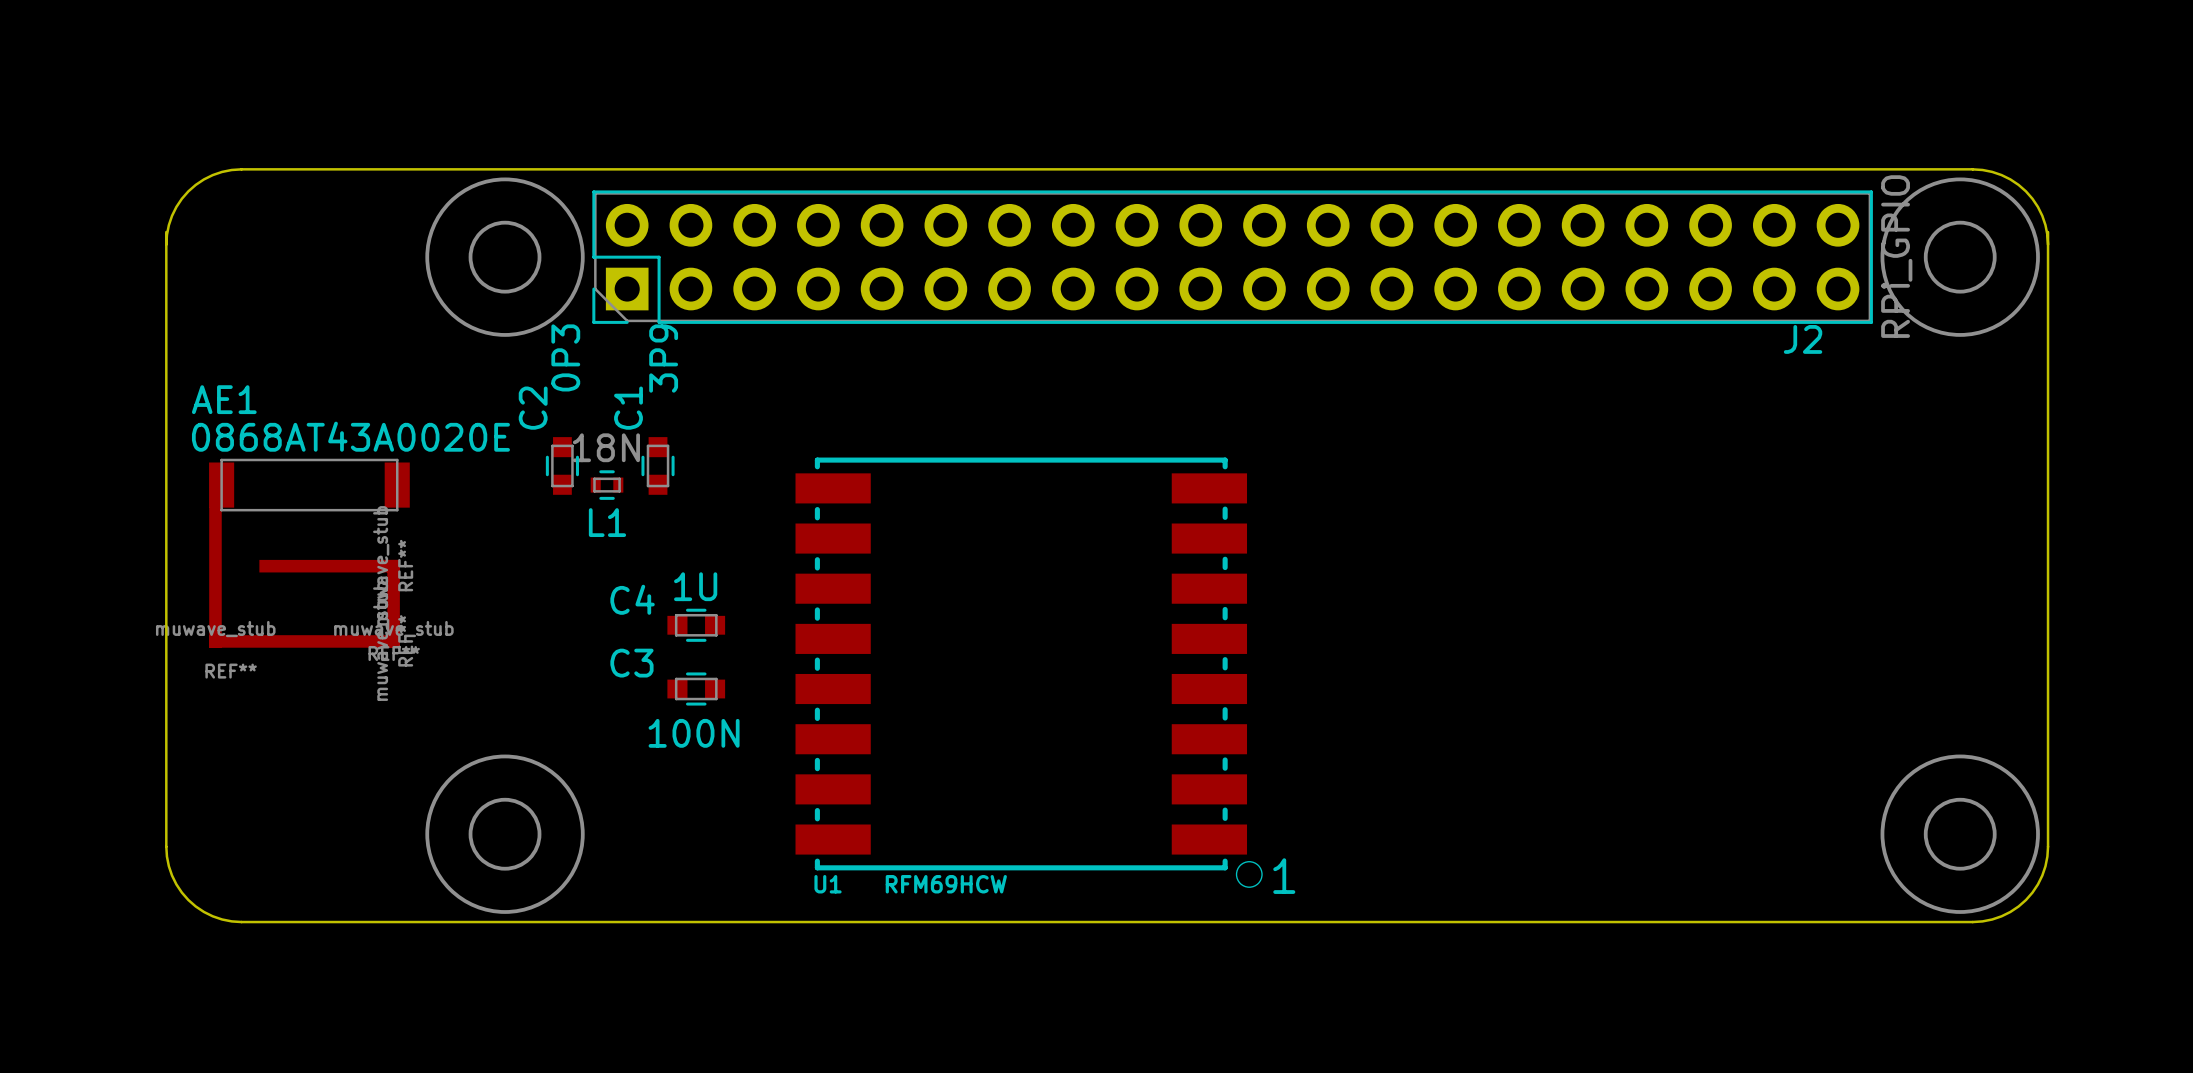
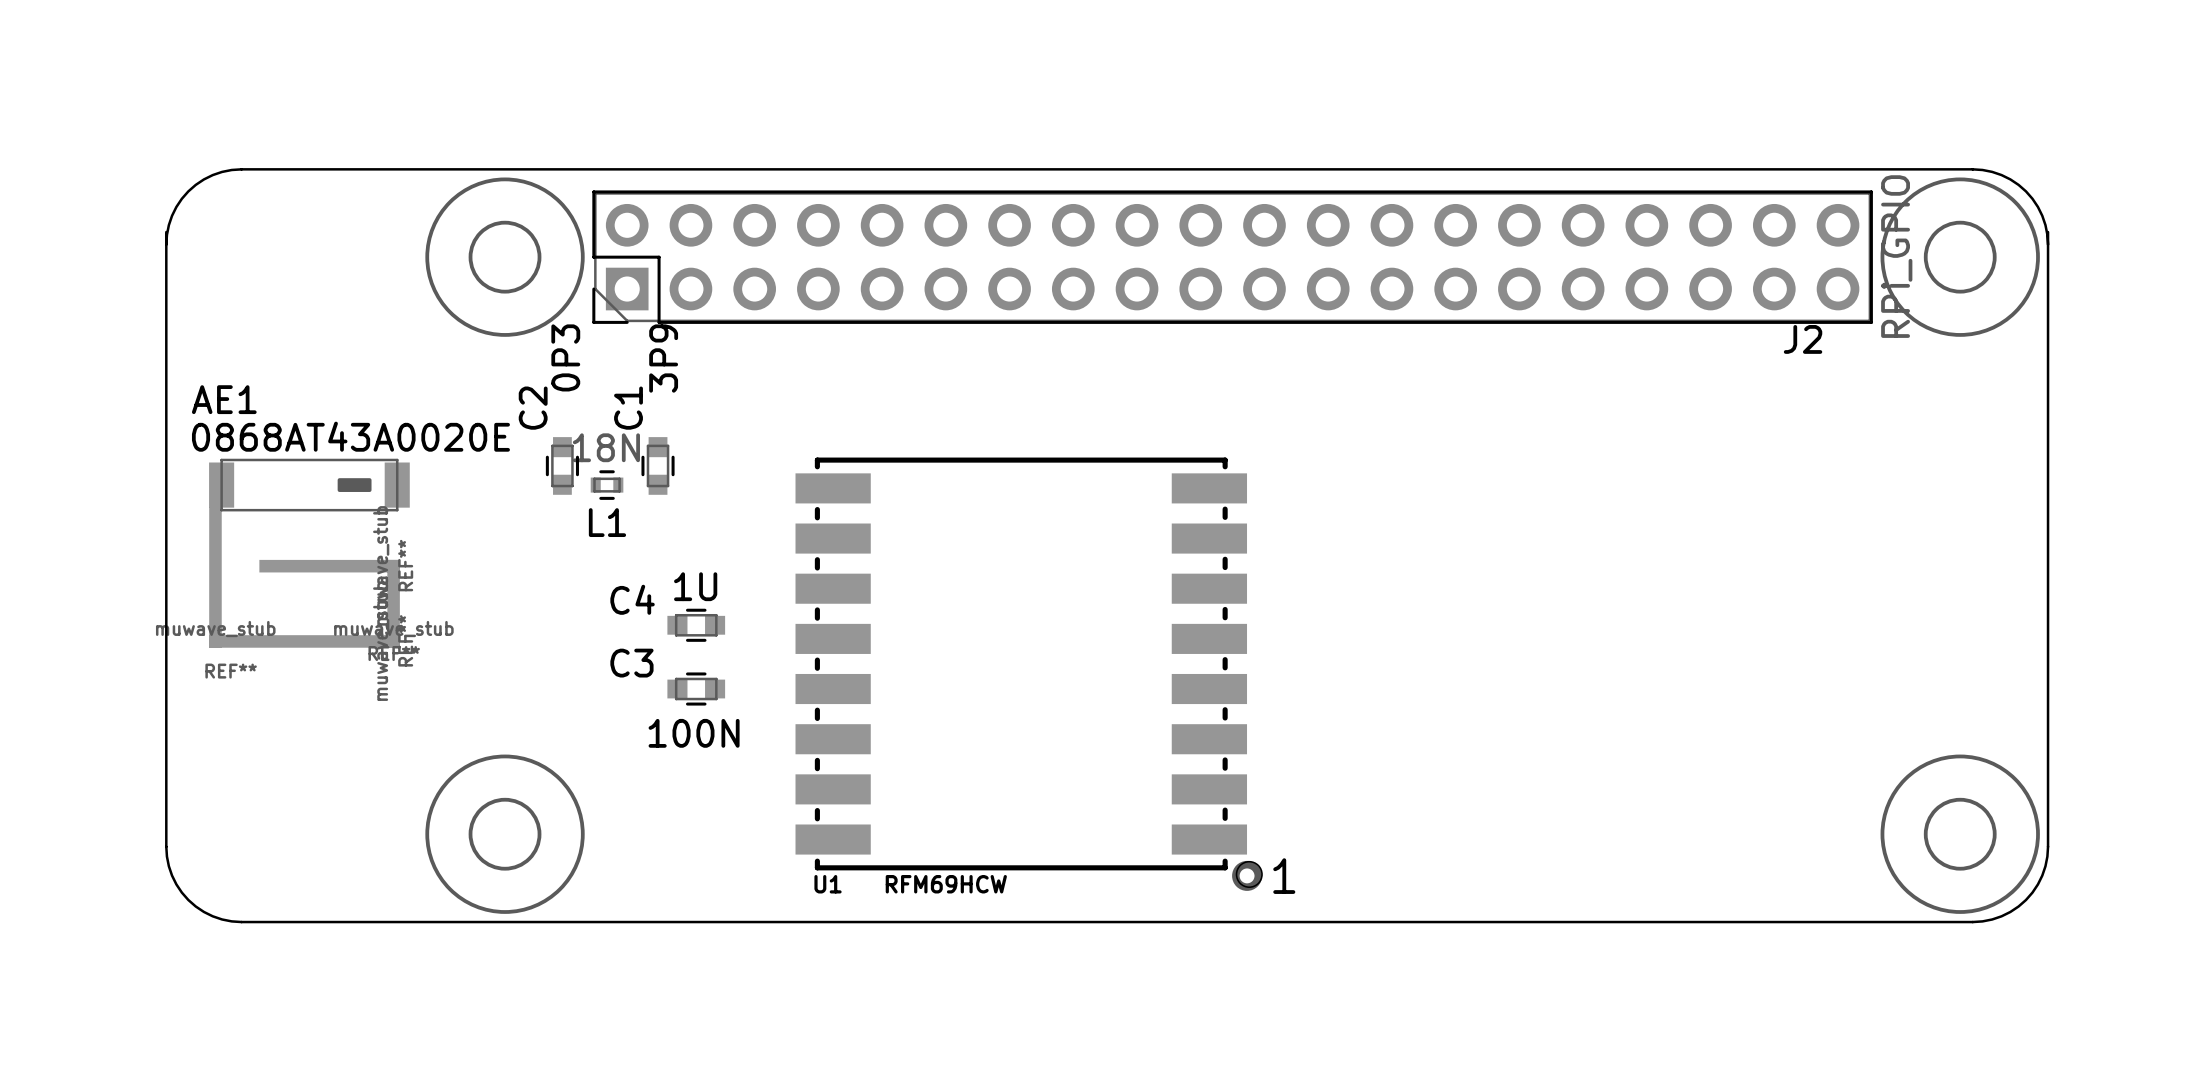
U1 footprint: [795, 457, 1263, 888] -> [795, 457, 1263, 891]
AE1 footprint: [209, 458, 410, 512] -> [209, 458, 410, 512]

